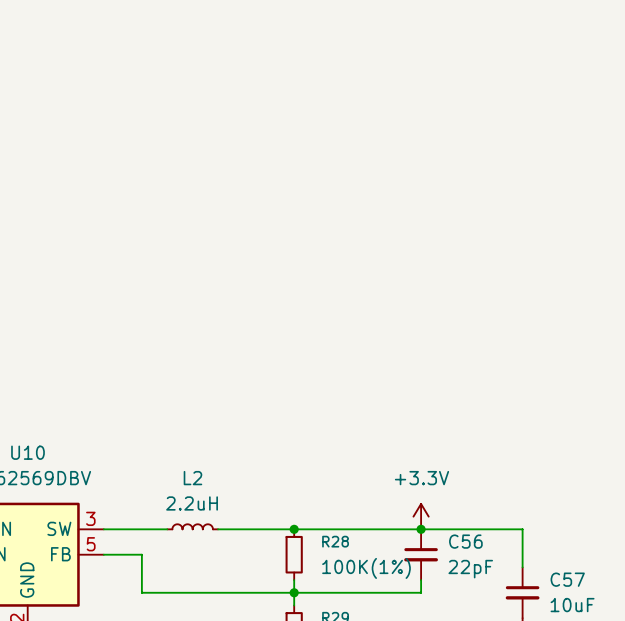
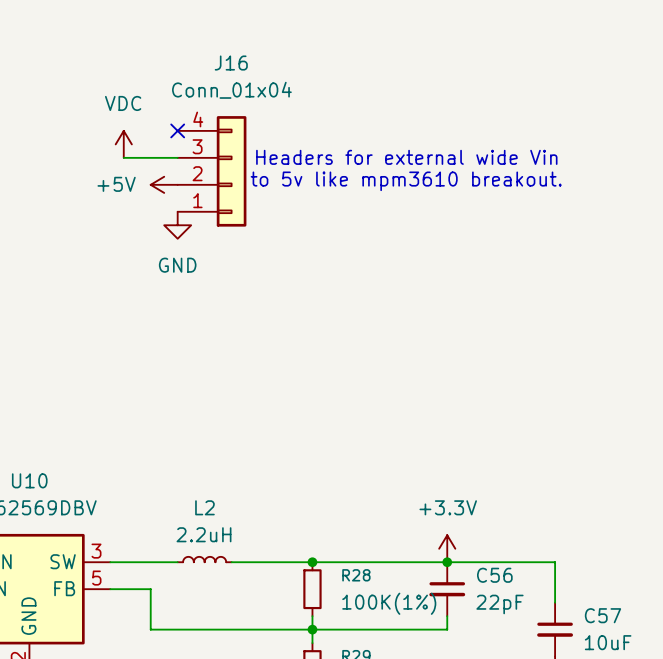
no-connect mark: none -> (177, 130)
power symbol: none -> VDC (123, 144)
wire: none -> (123, 157) (177, 157)
text: none -> Headers for external wide Vin (406, 157)
J16: none -> Conn_01x04 (212, 171)
text: none -> to 5v like mpm3610 breakout. (406, 181)
power symbol: none -> +5V (164, 184)
power symbol: none -> GND (177, 225)

